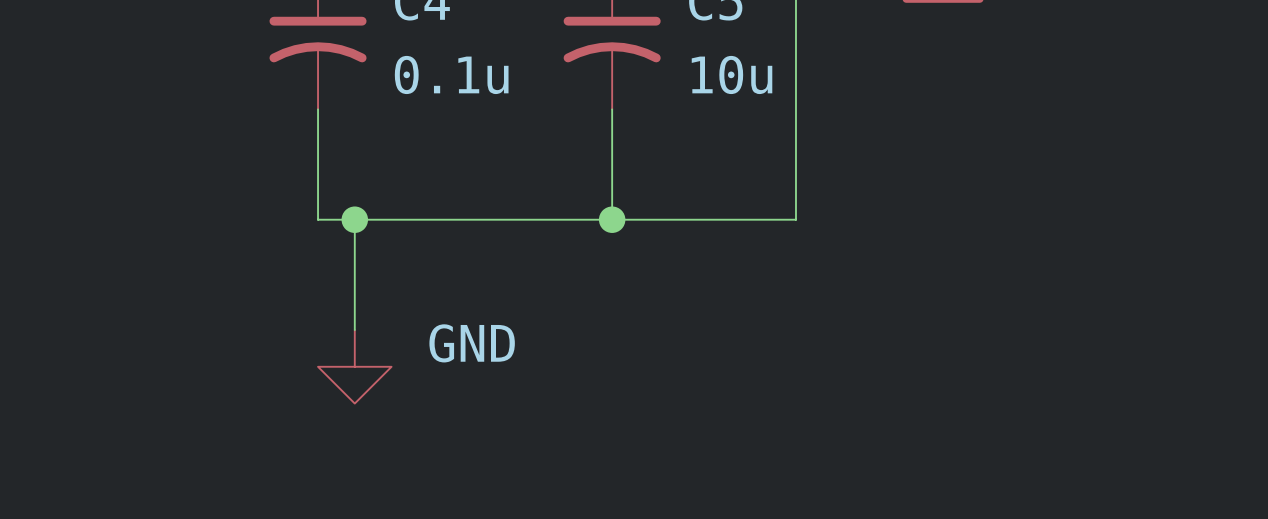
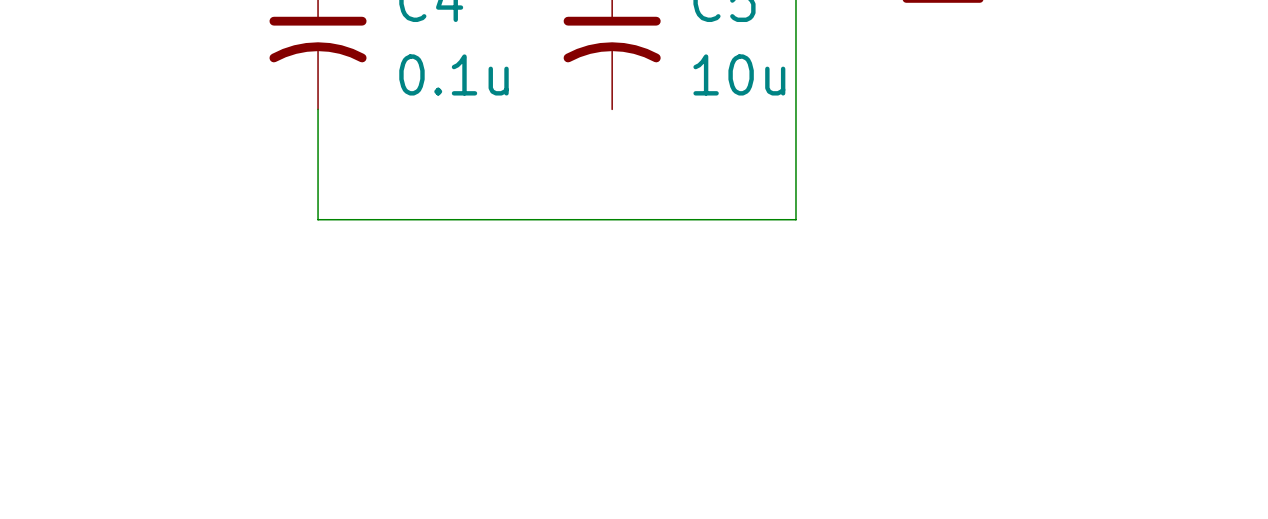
wire: (612, 109) (612, 219) -> none
wire: (354, 219) (354, 330) -> none
junction: (354, 219) -> none
junction: (612, 219) -> none
power symbol: GND (354, 366) -> none

